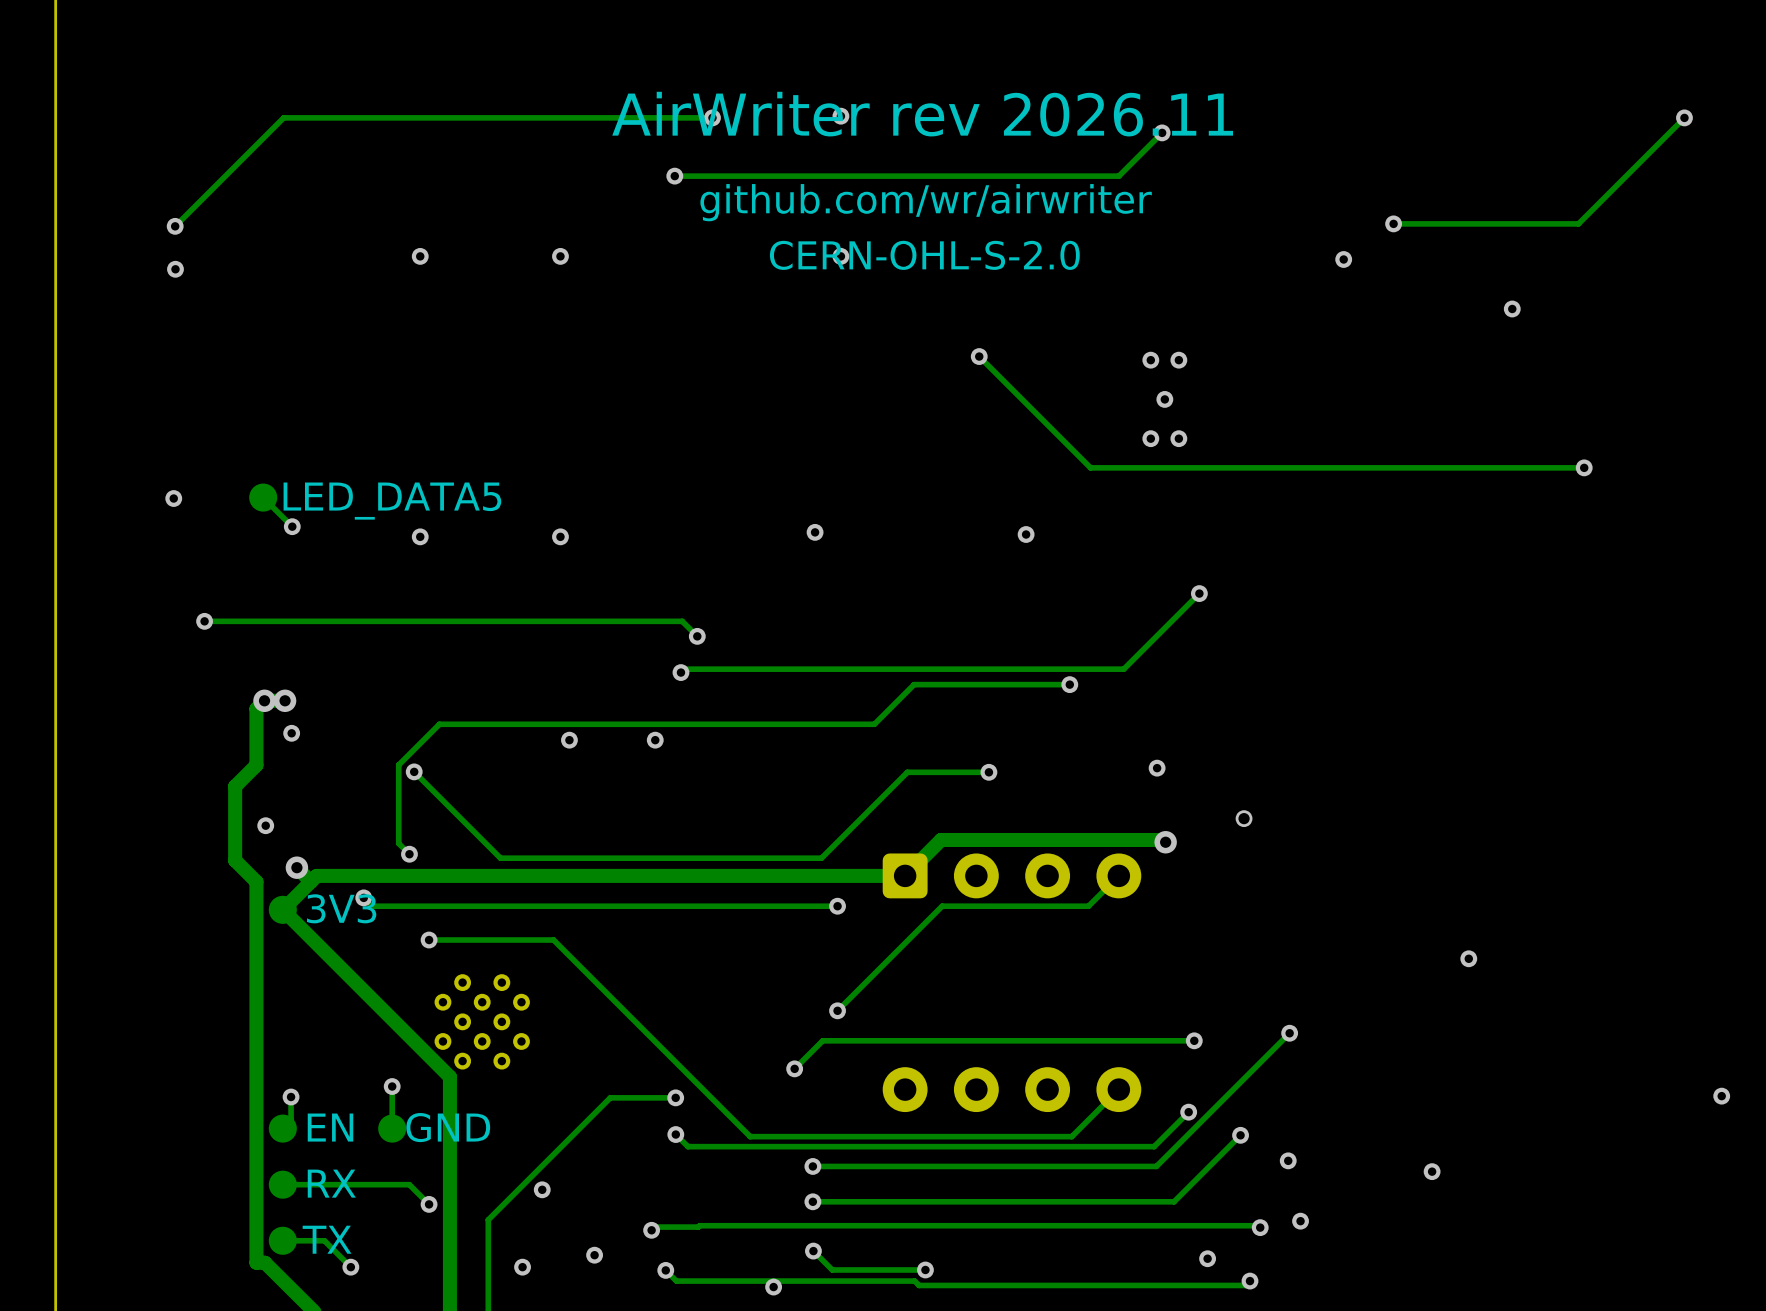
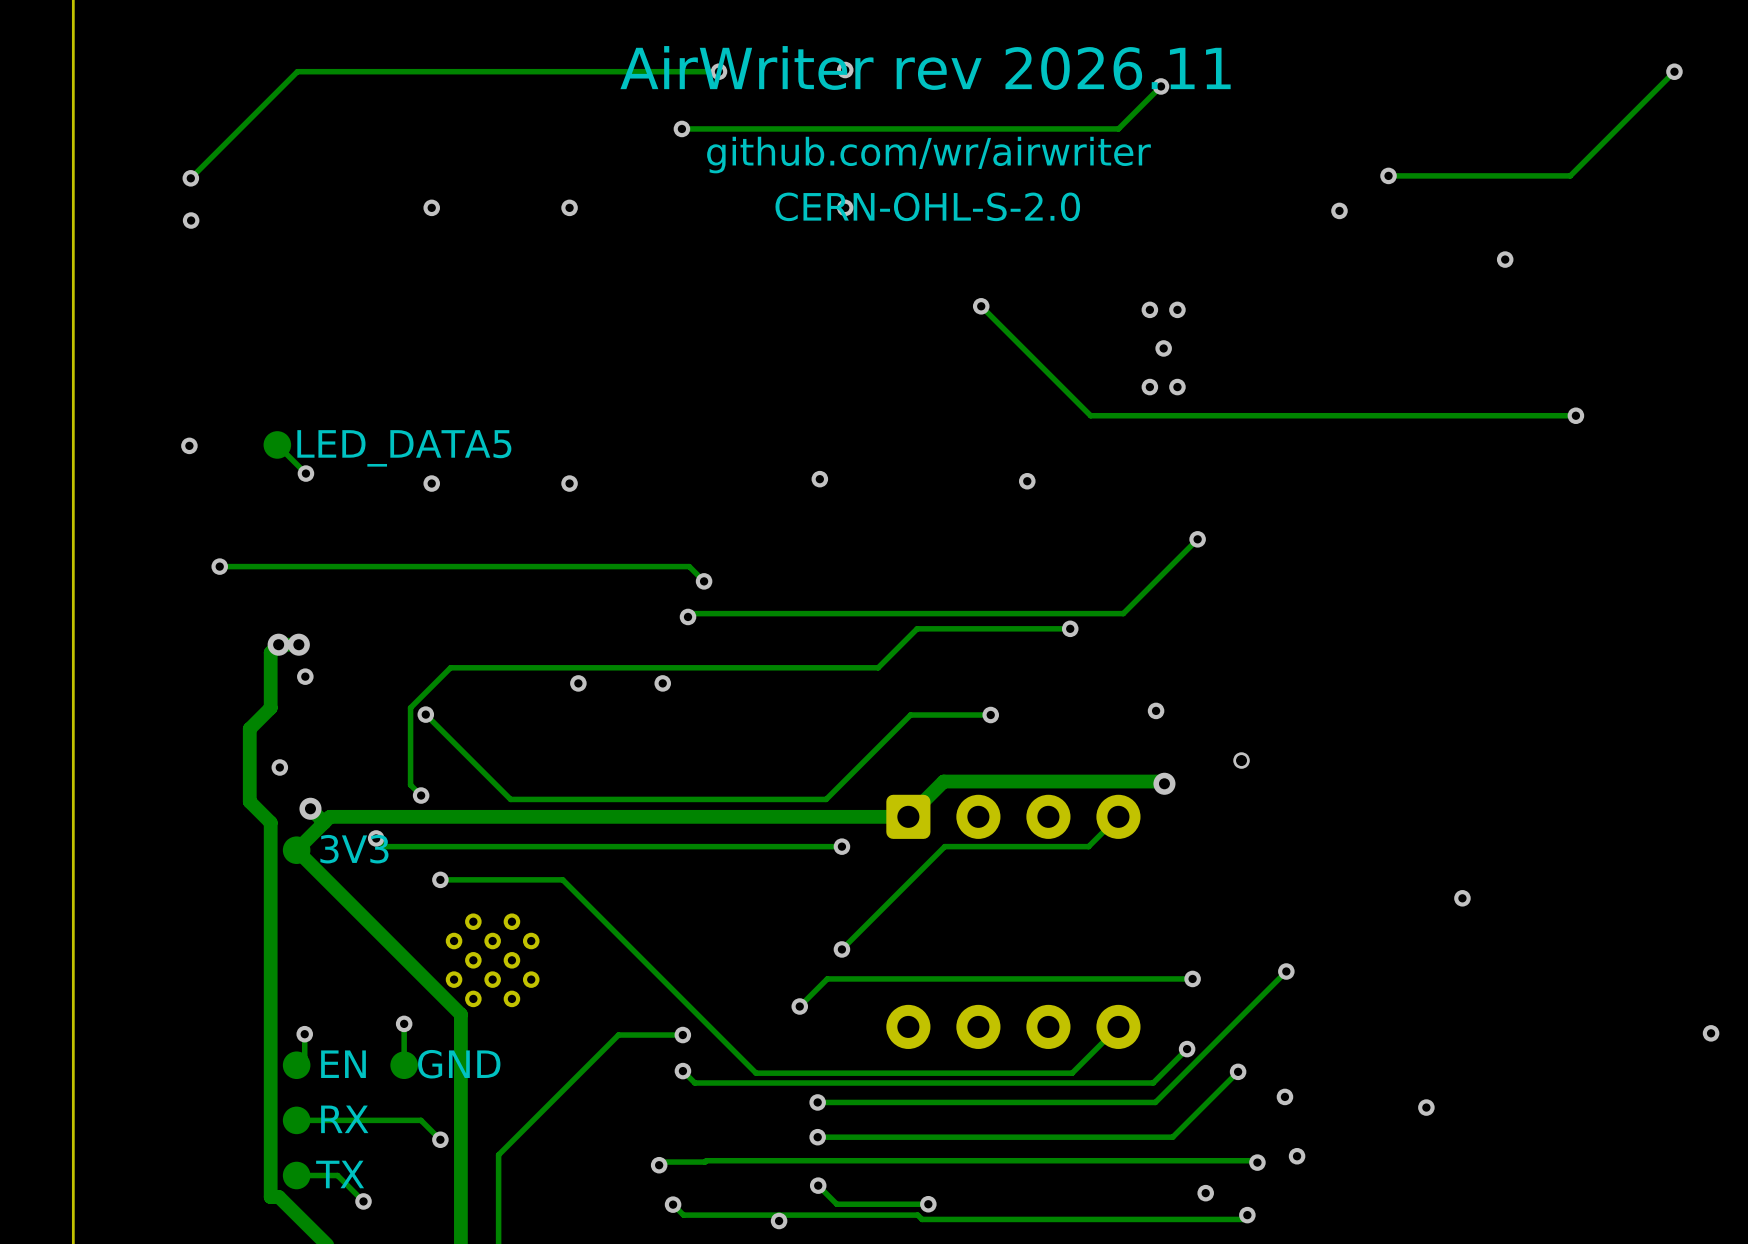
via: (542, 1189) -> none
via: (594, 1255) -> none
via: (522, 1267) -> none

